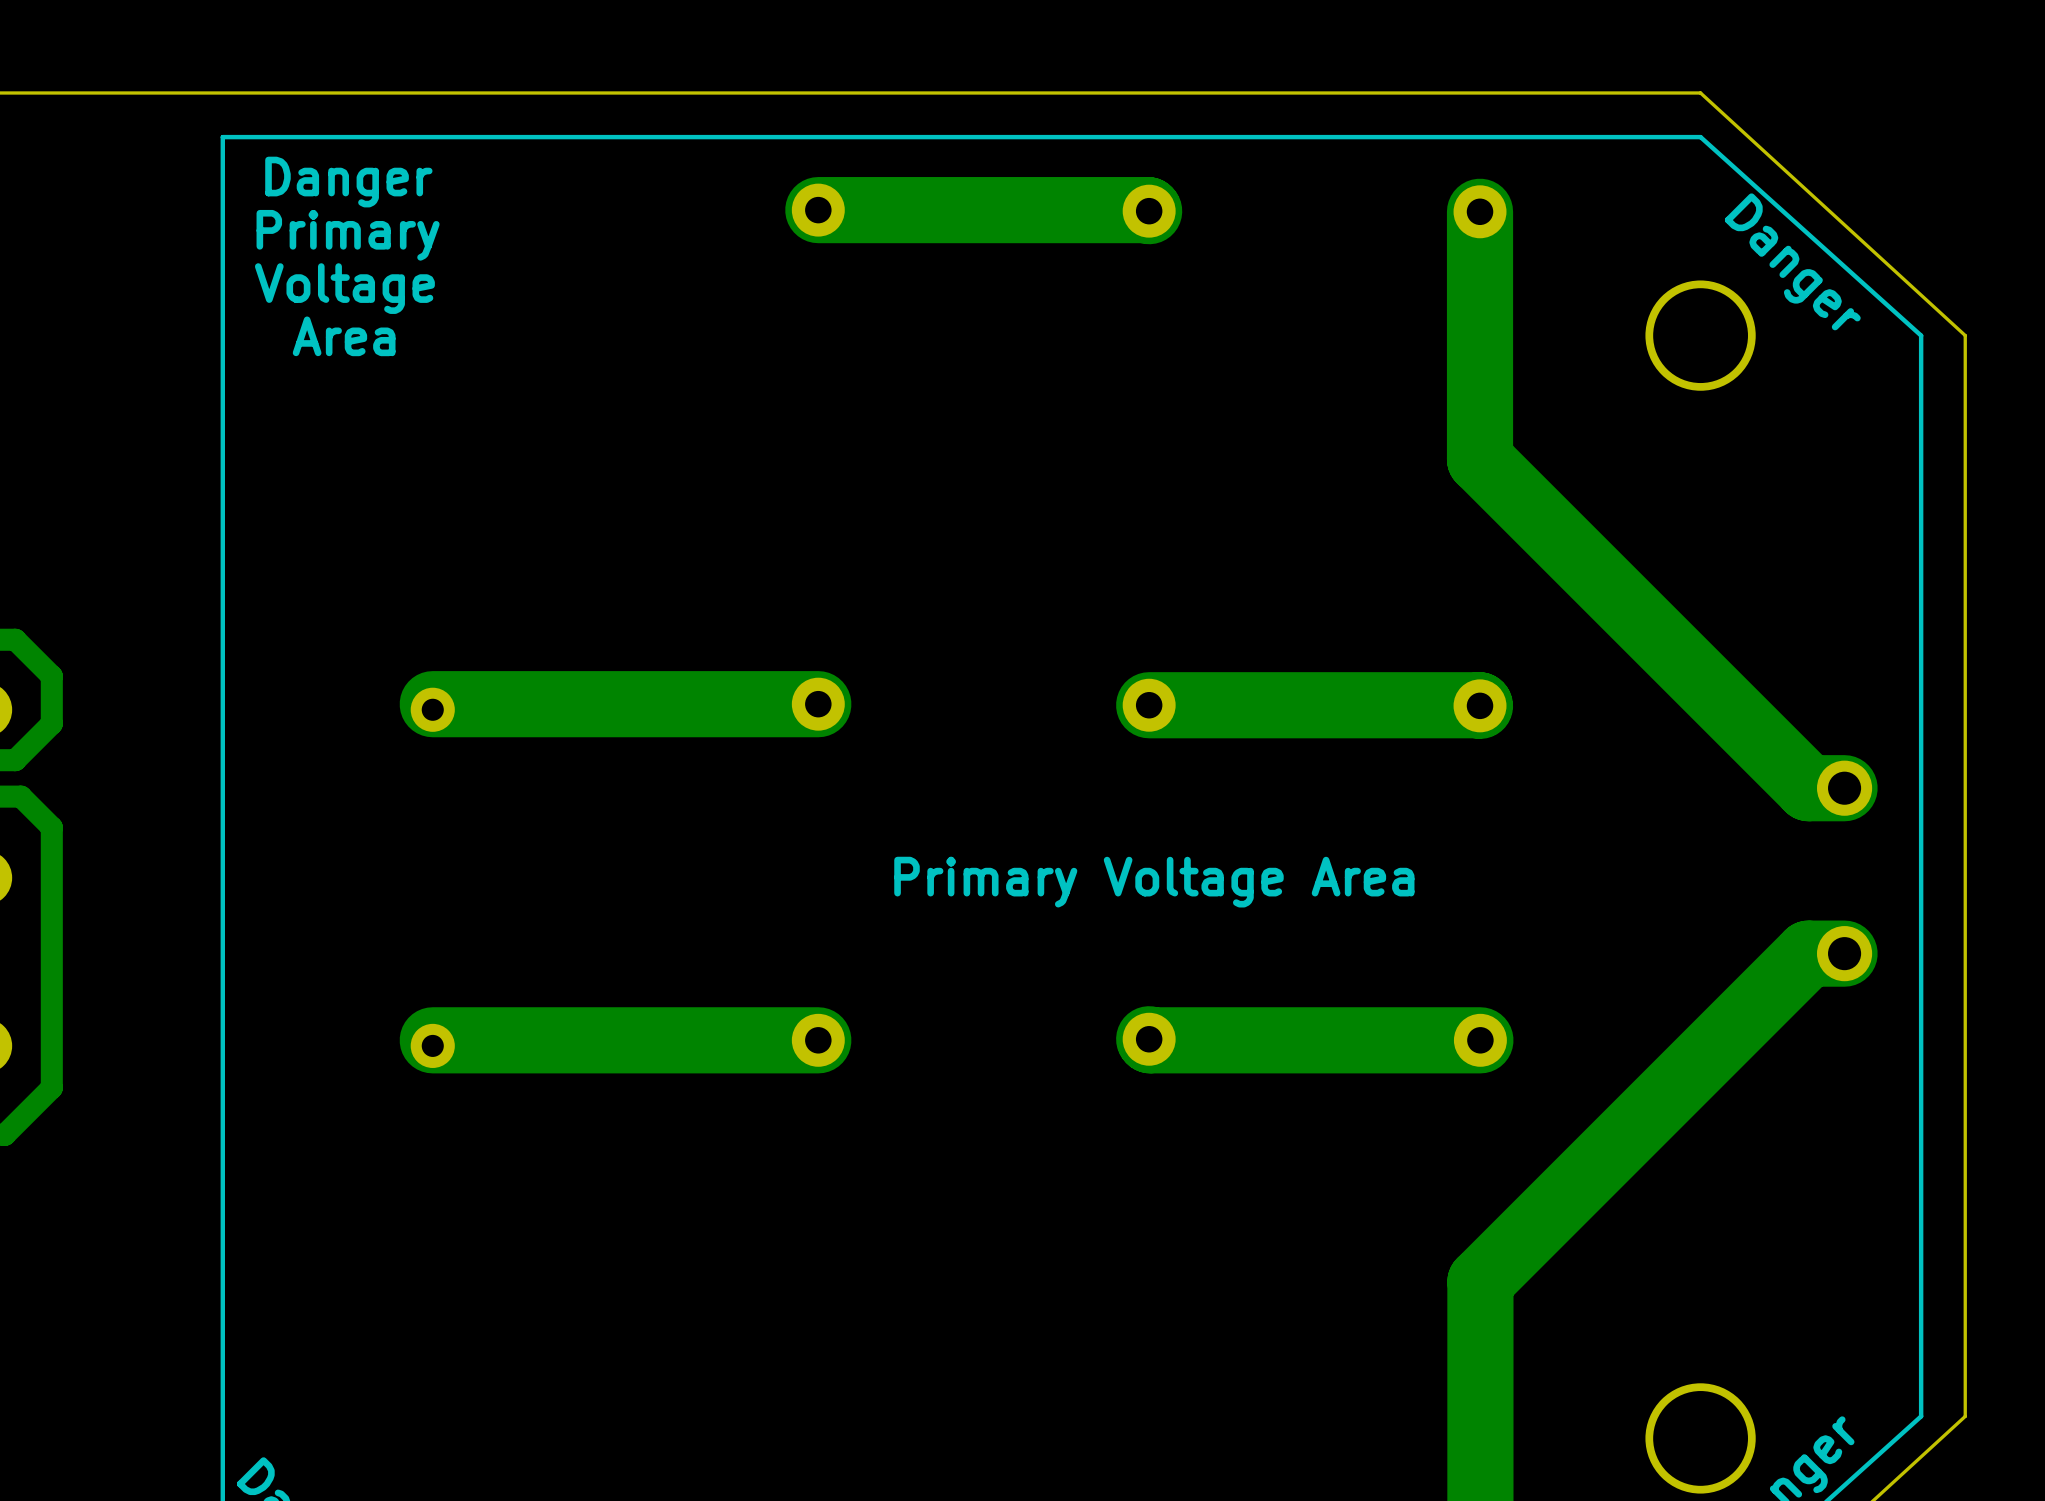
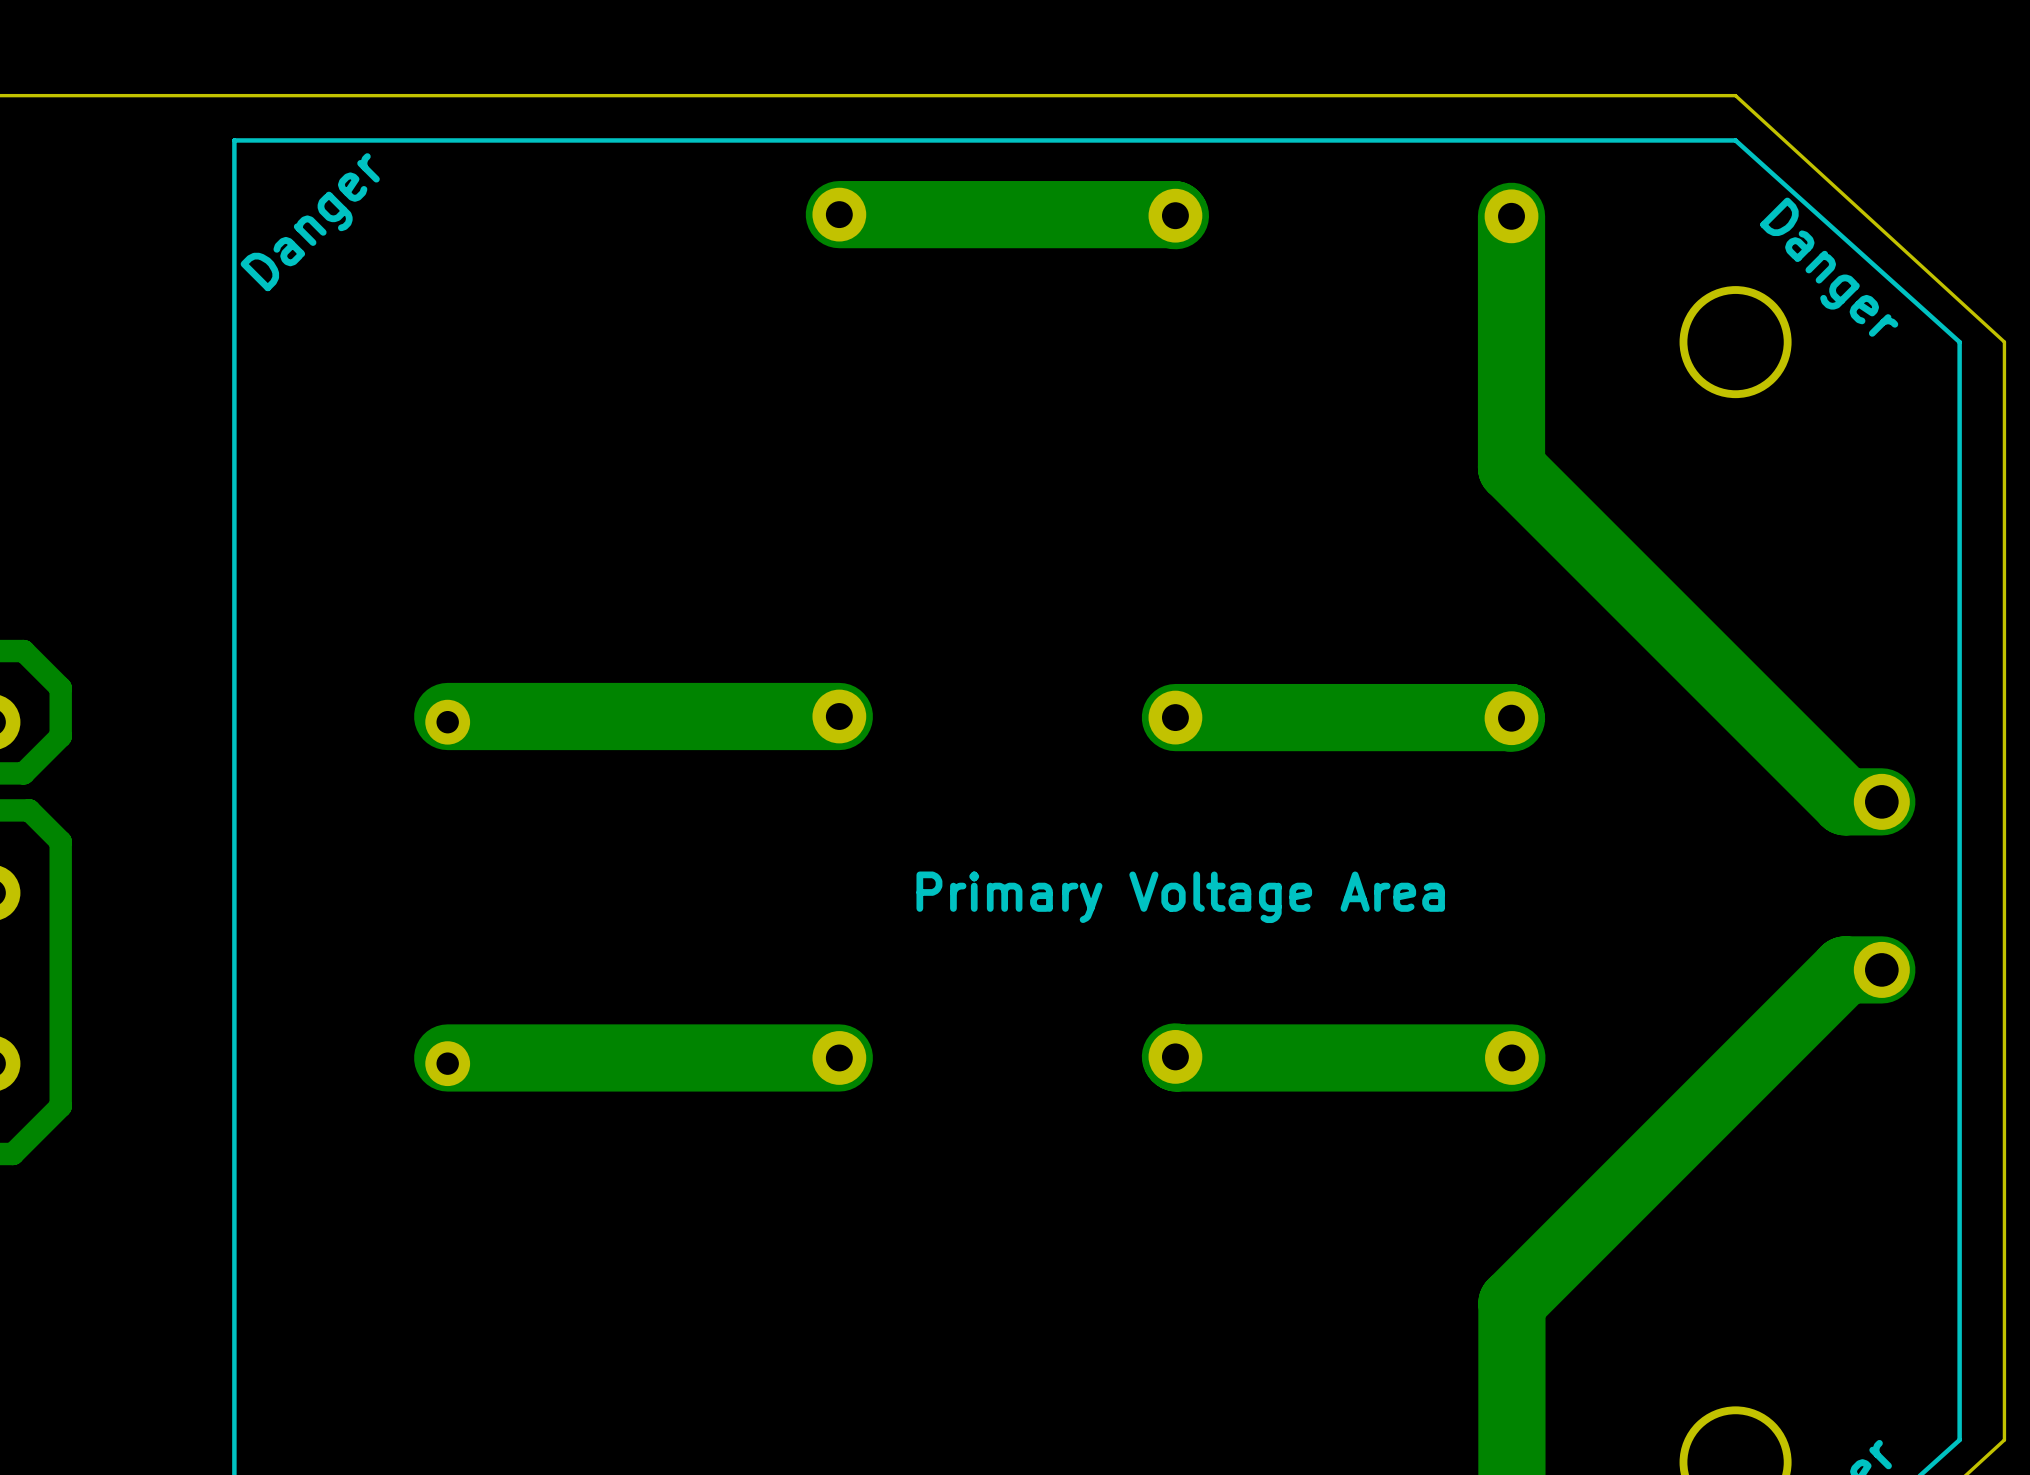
text rotation: 0° (348, 182) -> 45° counterclockwise (310, 222)
text: Primary (348, 235) -> none
text: Voltage (344, 288) -> none
text: Area (344, 336) -> none

